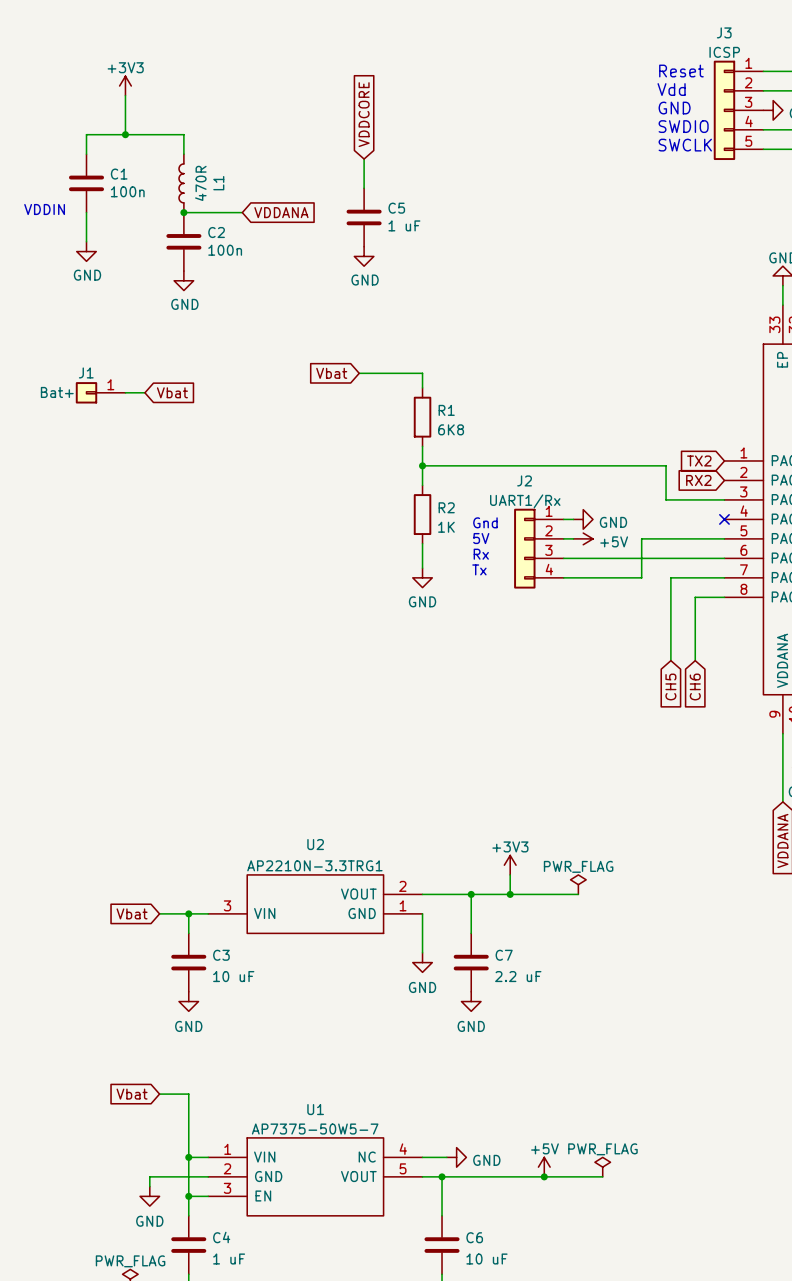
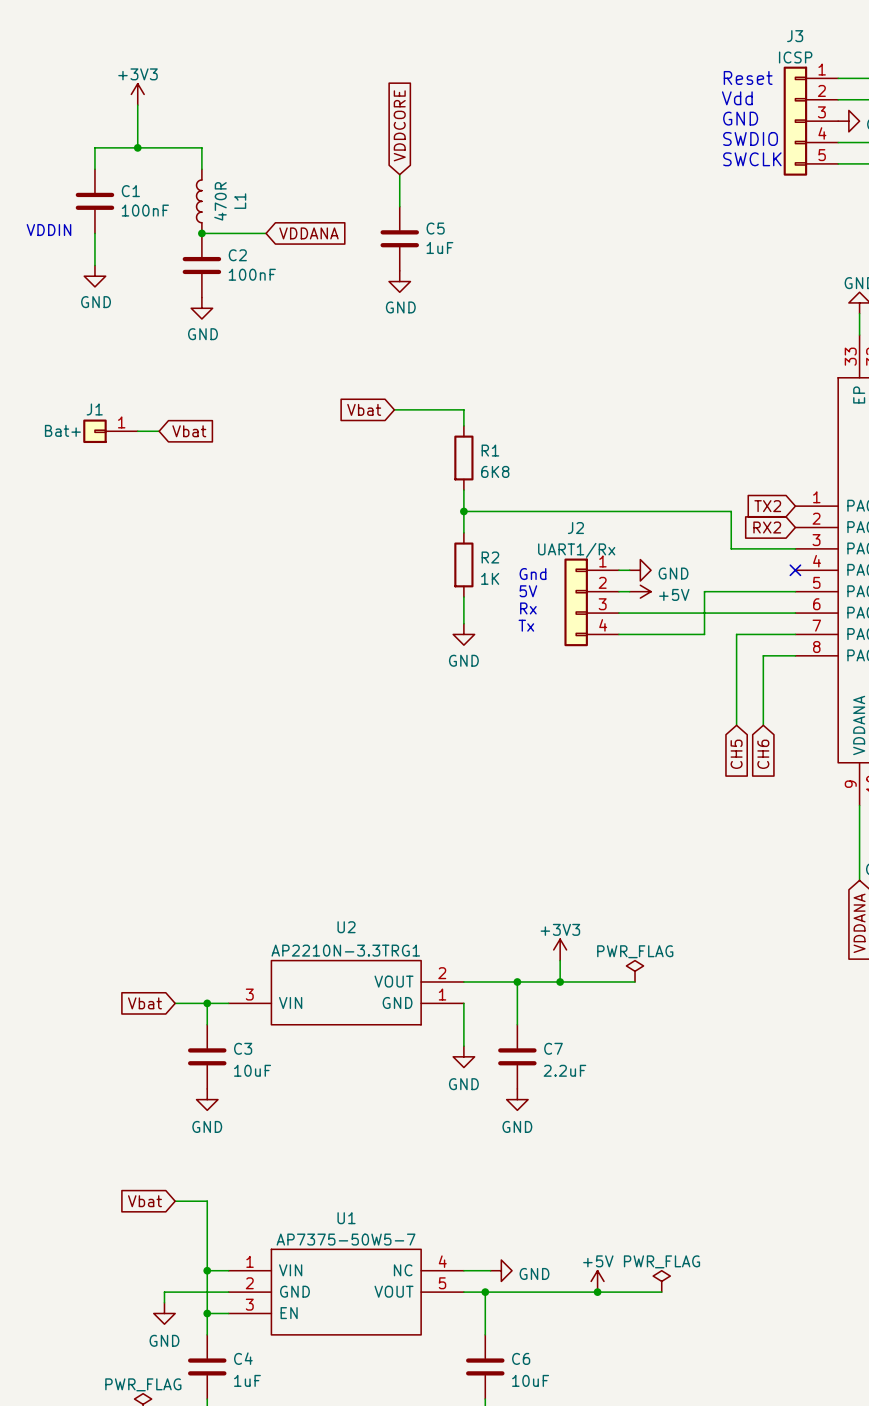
C1 value: 100n (127, 191) -> 100nF (145, 210)
C5 value: 1 uF (404, 225) -> 1uF (439, 248)
C2 value: 100n (225, 250) -> 100nF (252, 274)
C3 value: 10 uF (233, 976) -> 10uF (252, 1070)
C7 value: 2.2 uF (518, 976) -> 2.2uF (564, 1070)
C4 value: 1 uF (229, 1259) -> 1uF (247, 1380)
C6 value: 10 uF (486, 1259) -> 10uF (530, 1380)

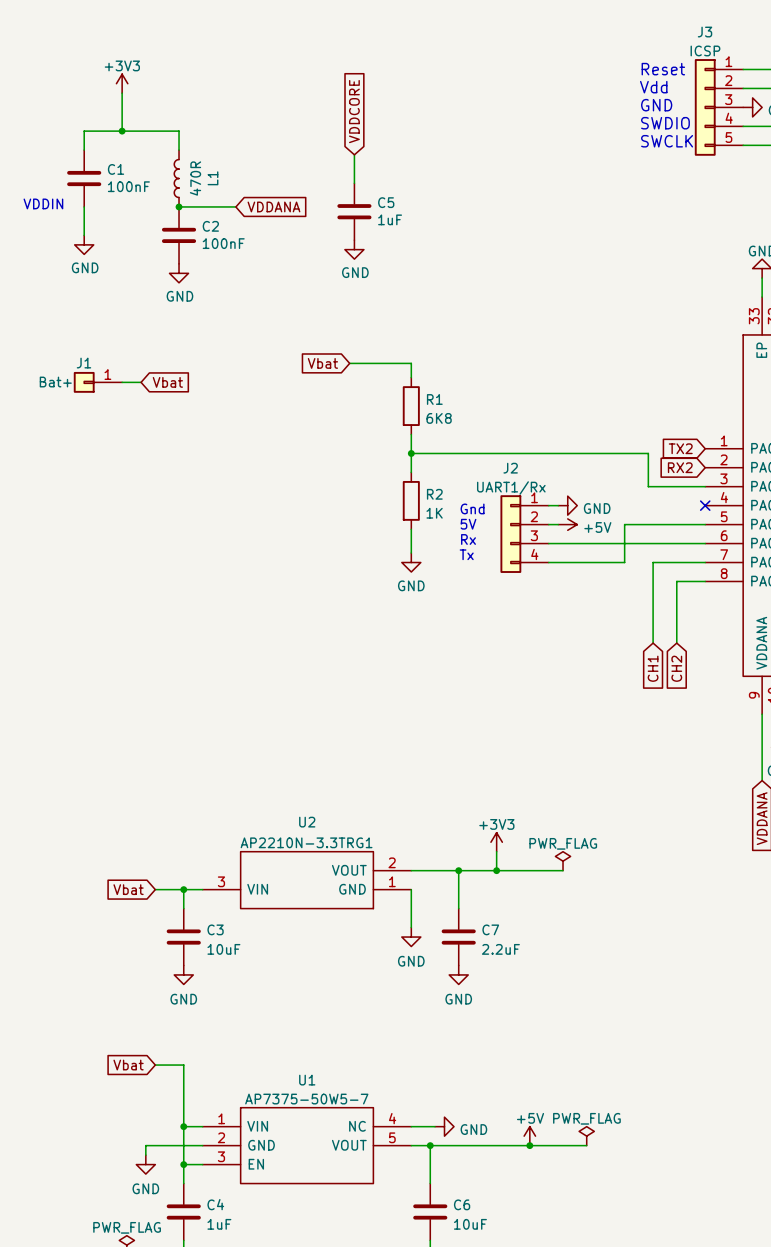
global label: CH5 (736, 754) -> CH1 (653, 668)
global label: CH6 (763, 754) -> CH2 (676, 668)

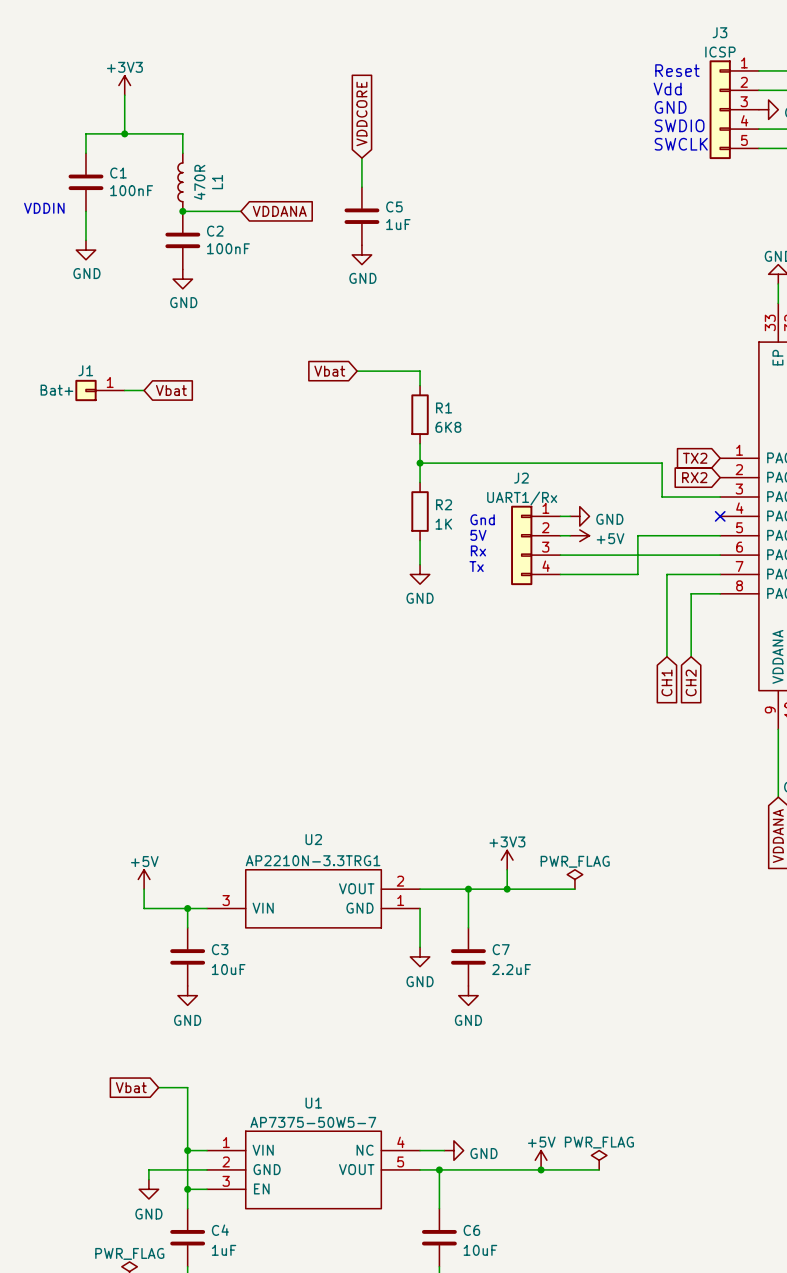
power symbol: none -> +5V (144, 879)
wire: none -> (144, 889) (144, 908) (158, 908)
global label: Vbat (128, 889) -> none

